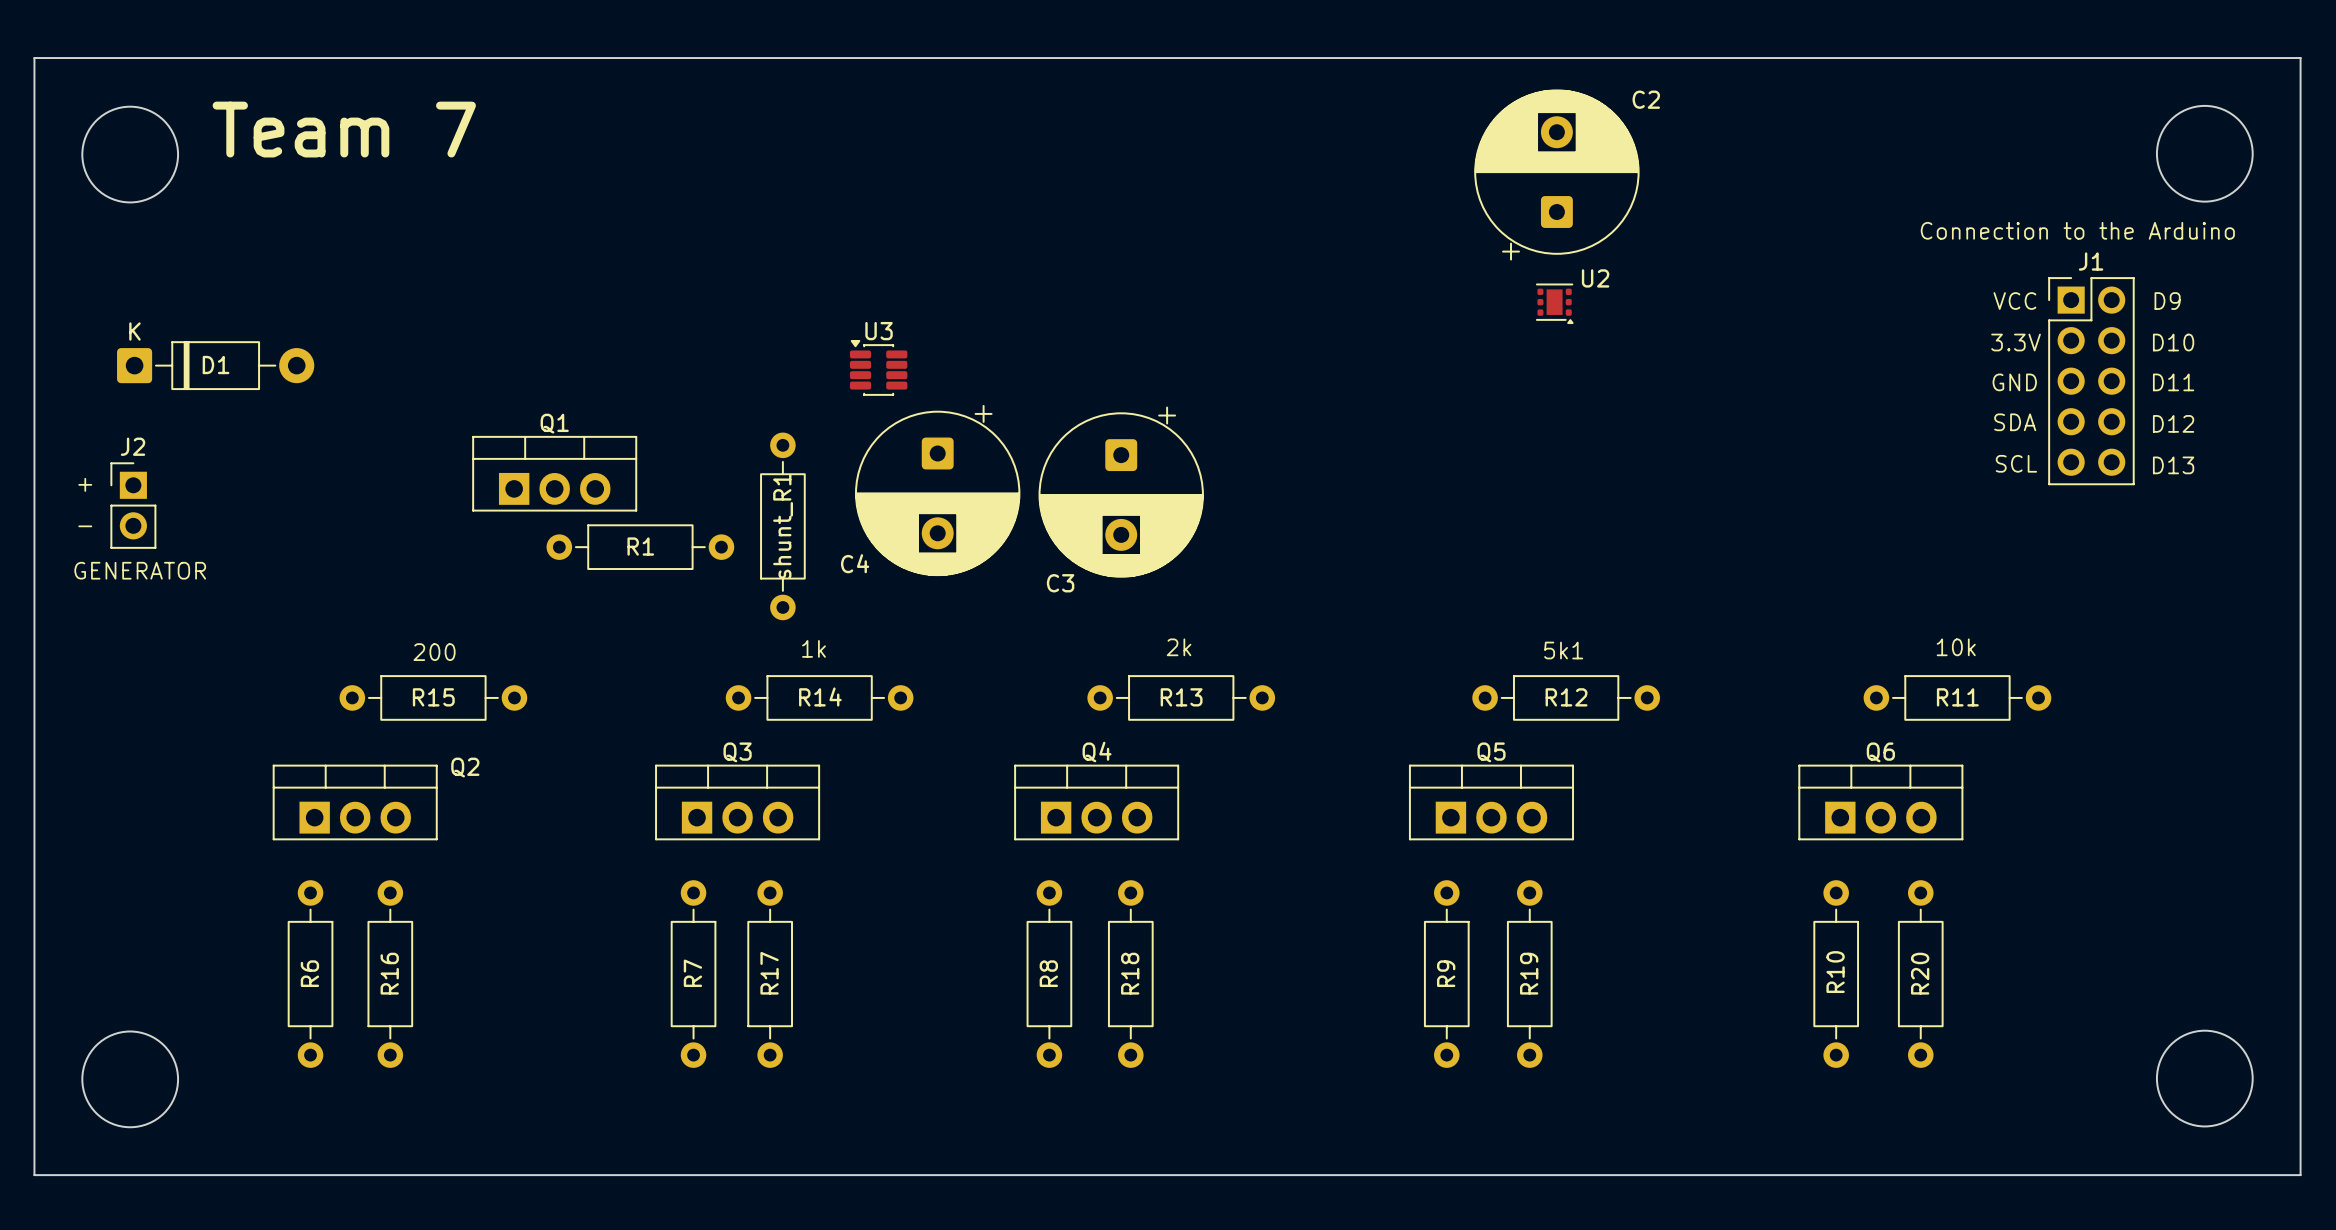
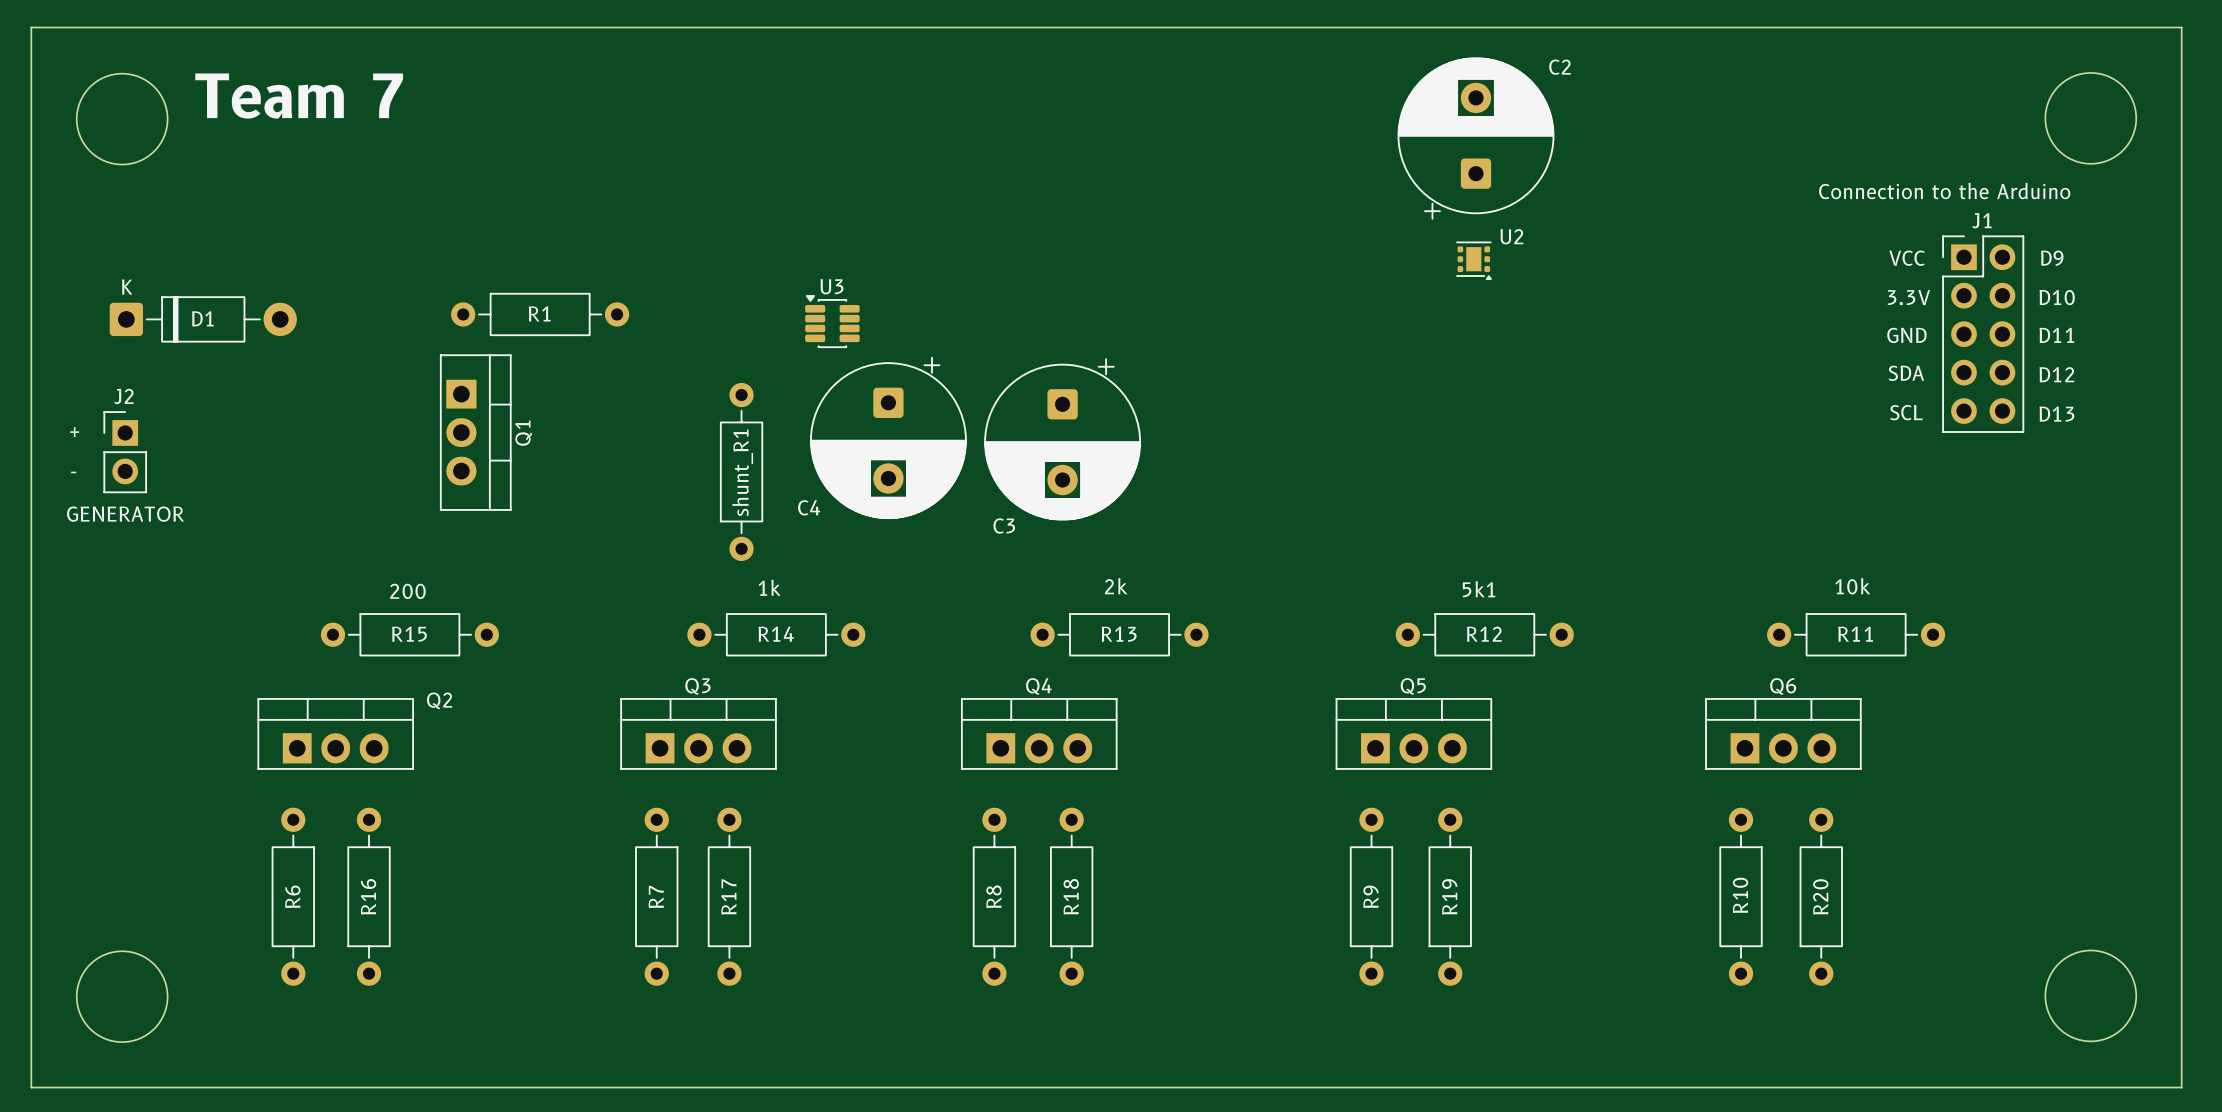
Q1 rotation: 0° (554, 473) -> 90° clockwise (475, 432)
R1 position: (640, 547) -> (540, 314)

